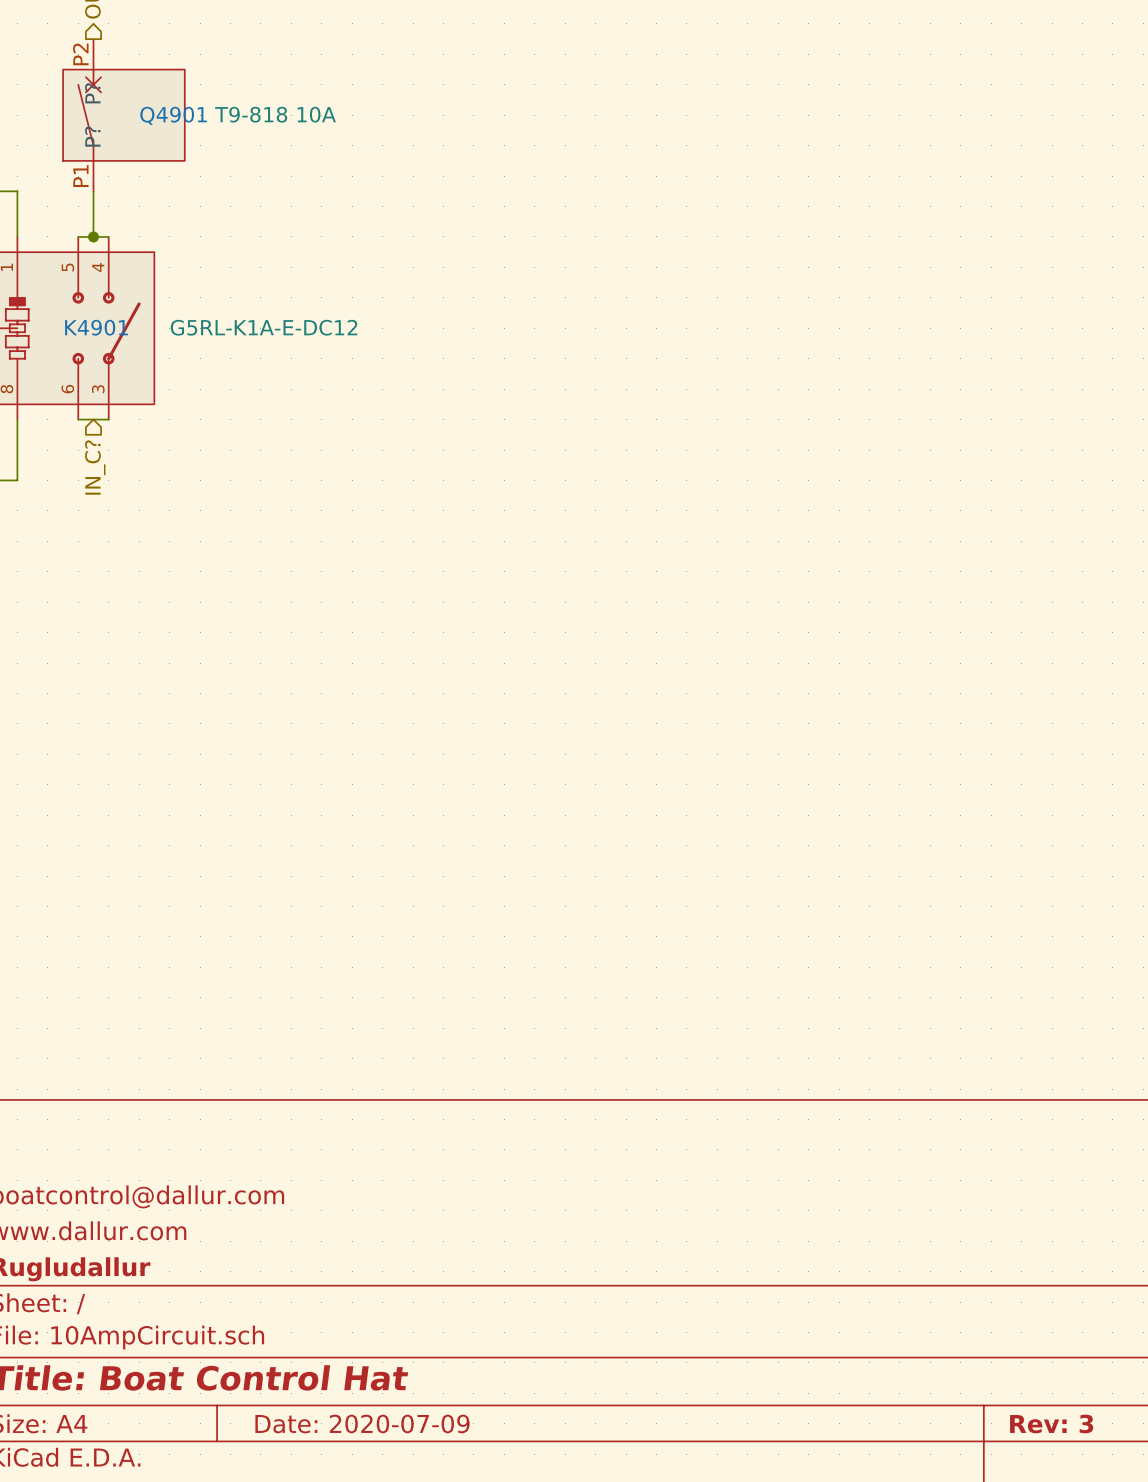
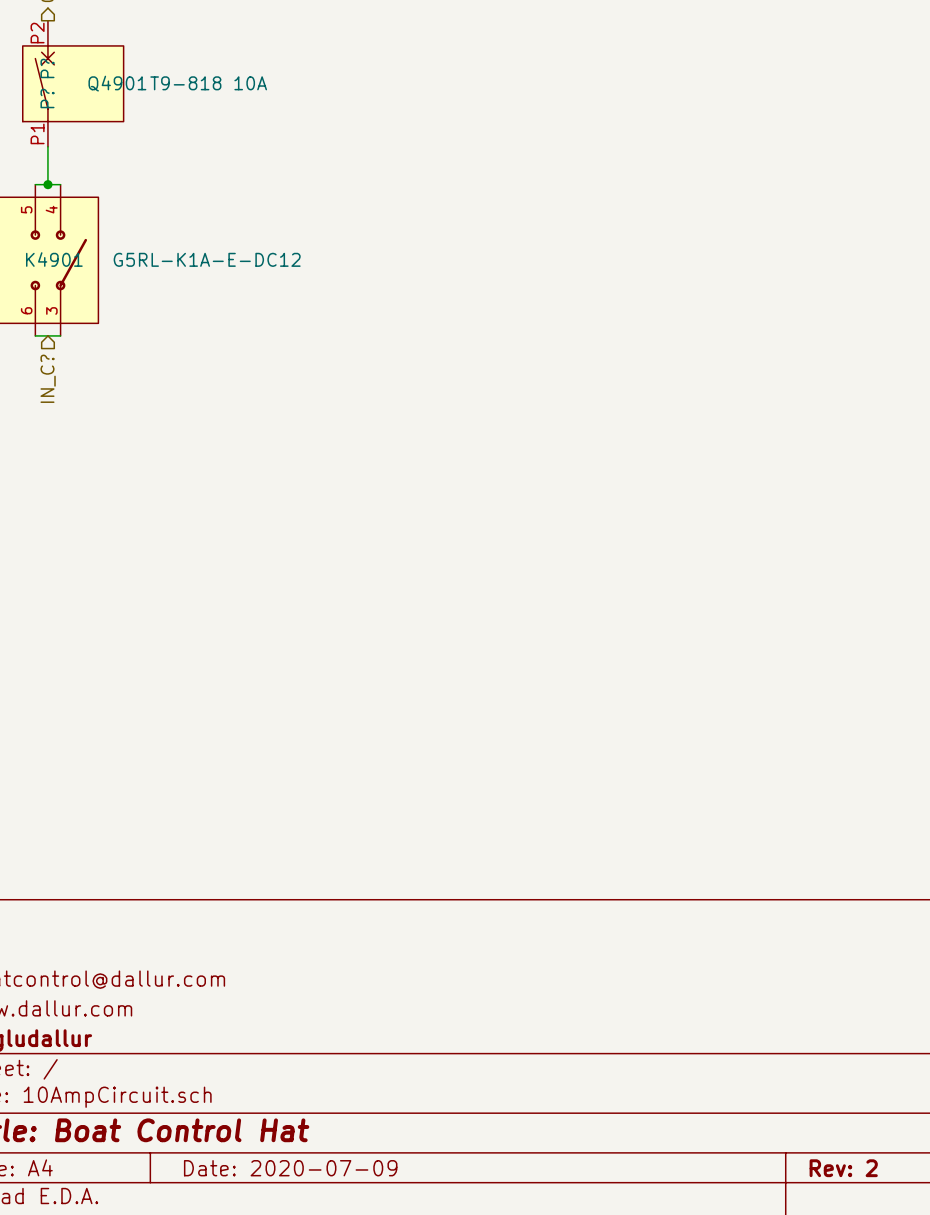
title block: Rev: 3 (1051, 1423) -> Rev: 2 (843, 1168)

